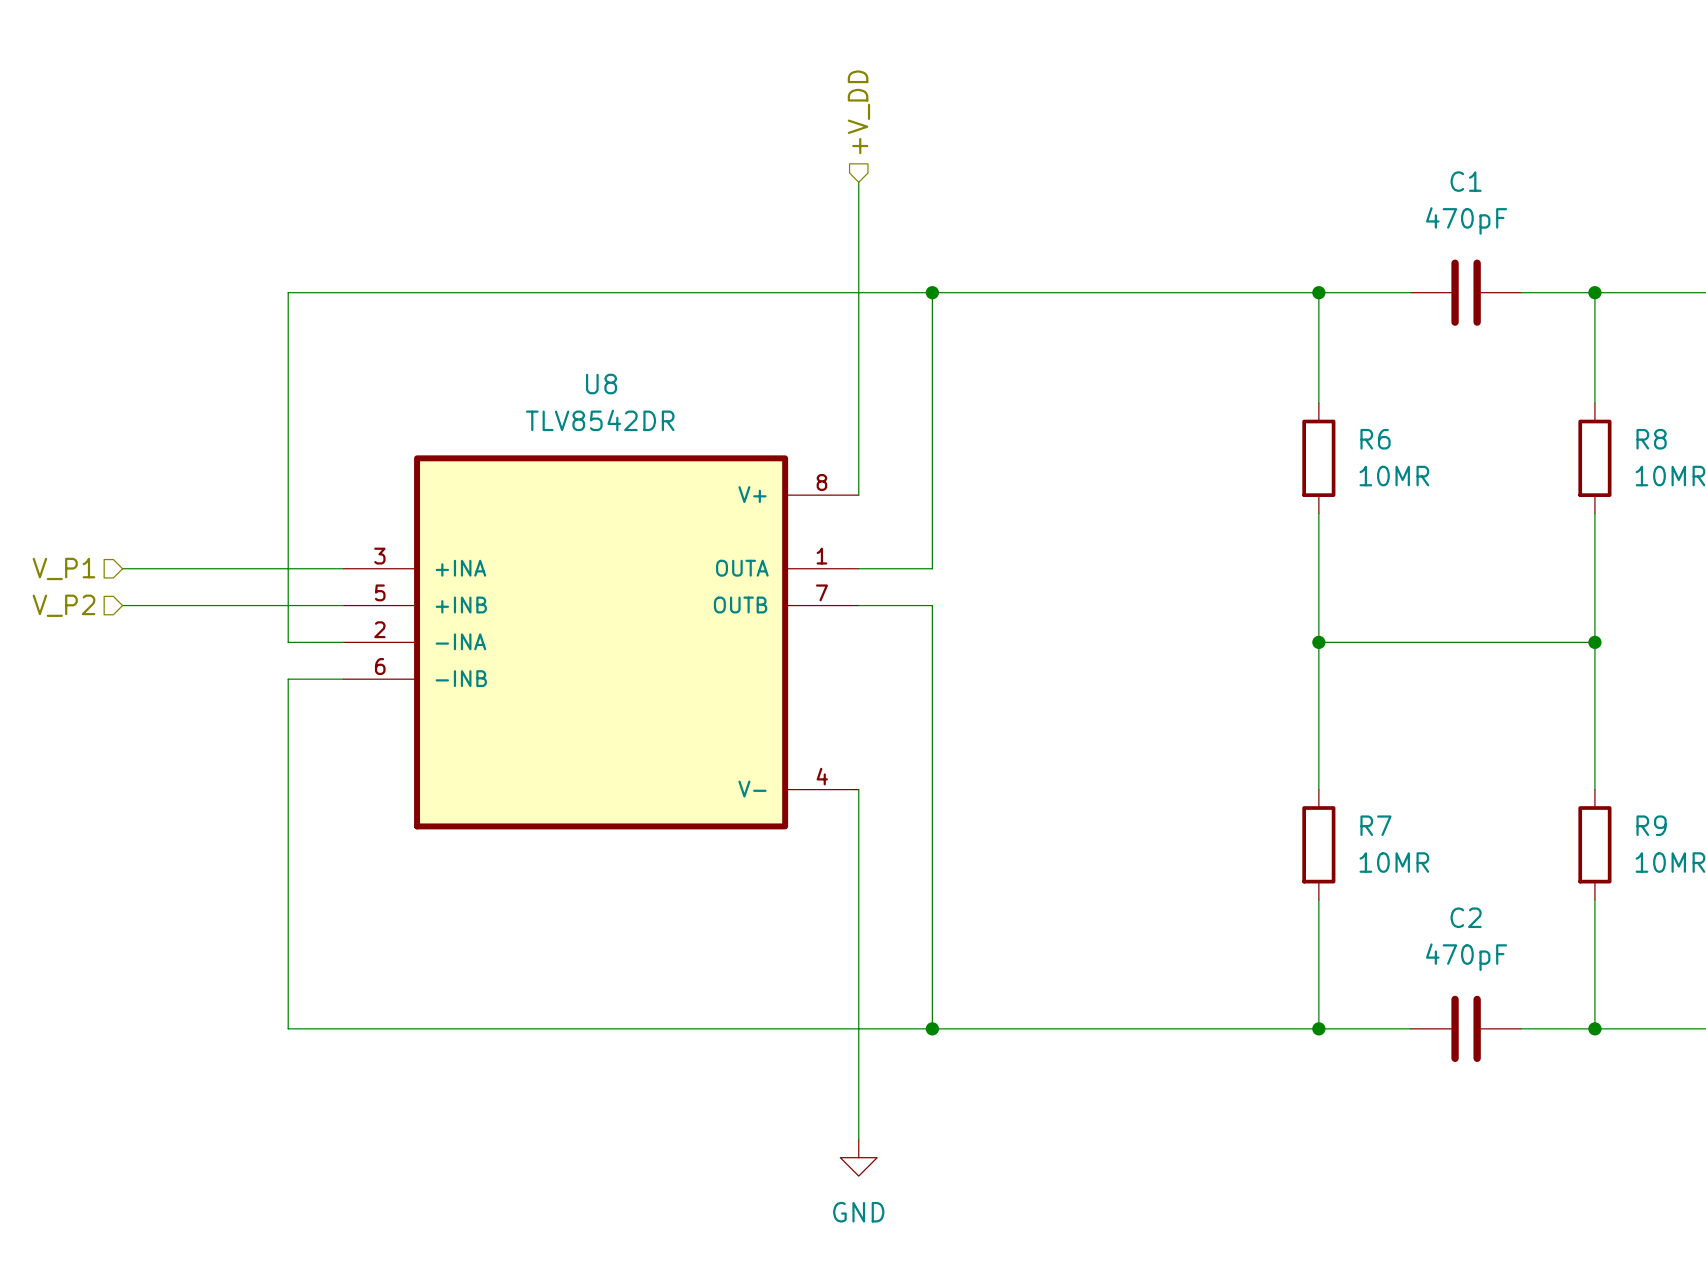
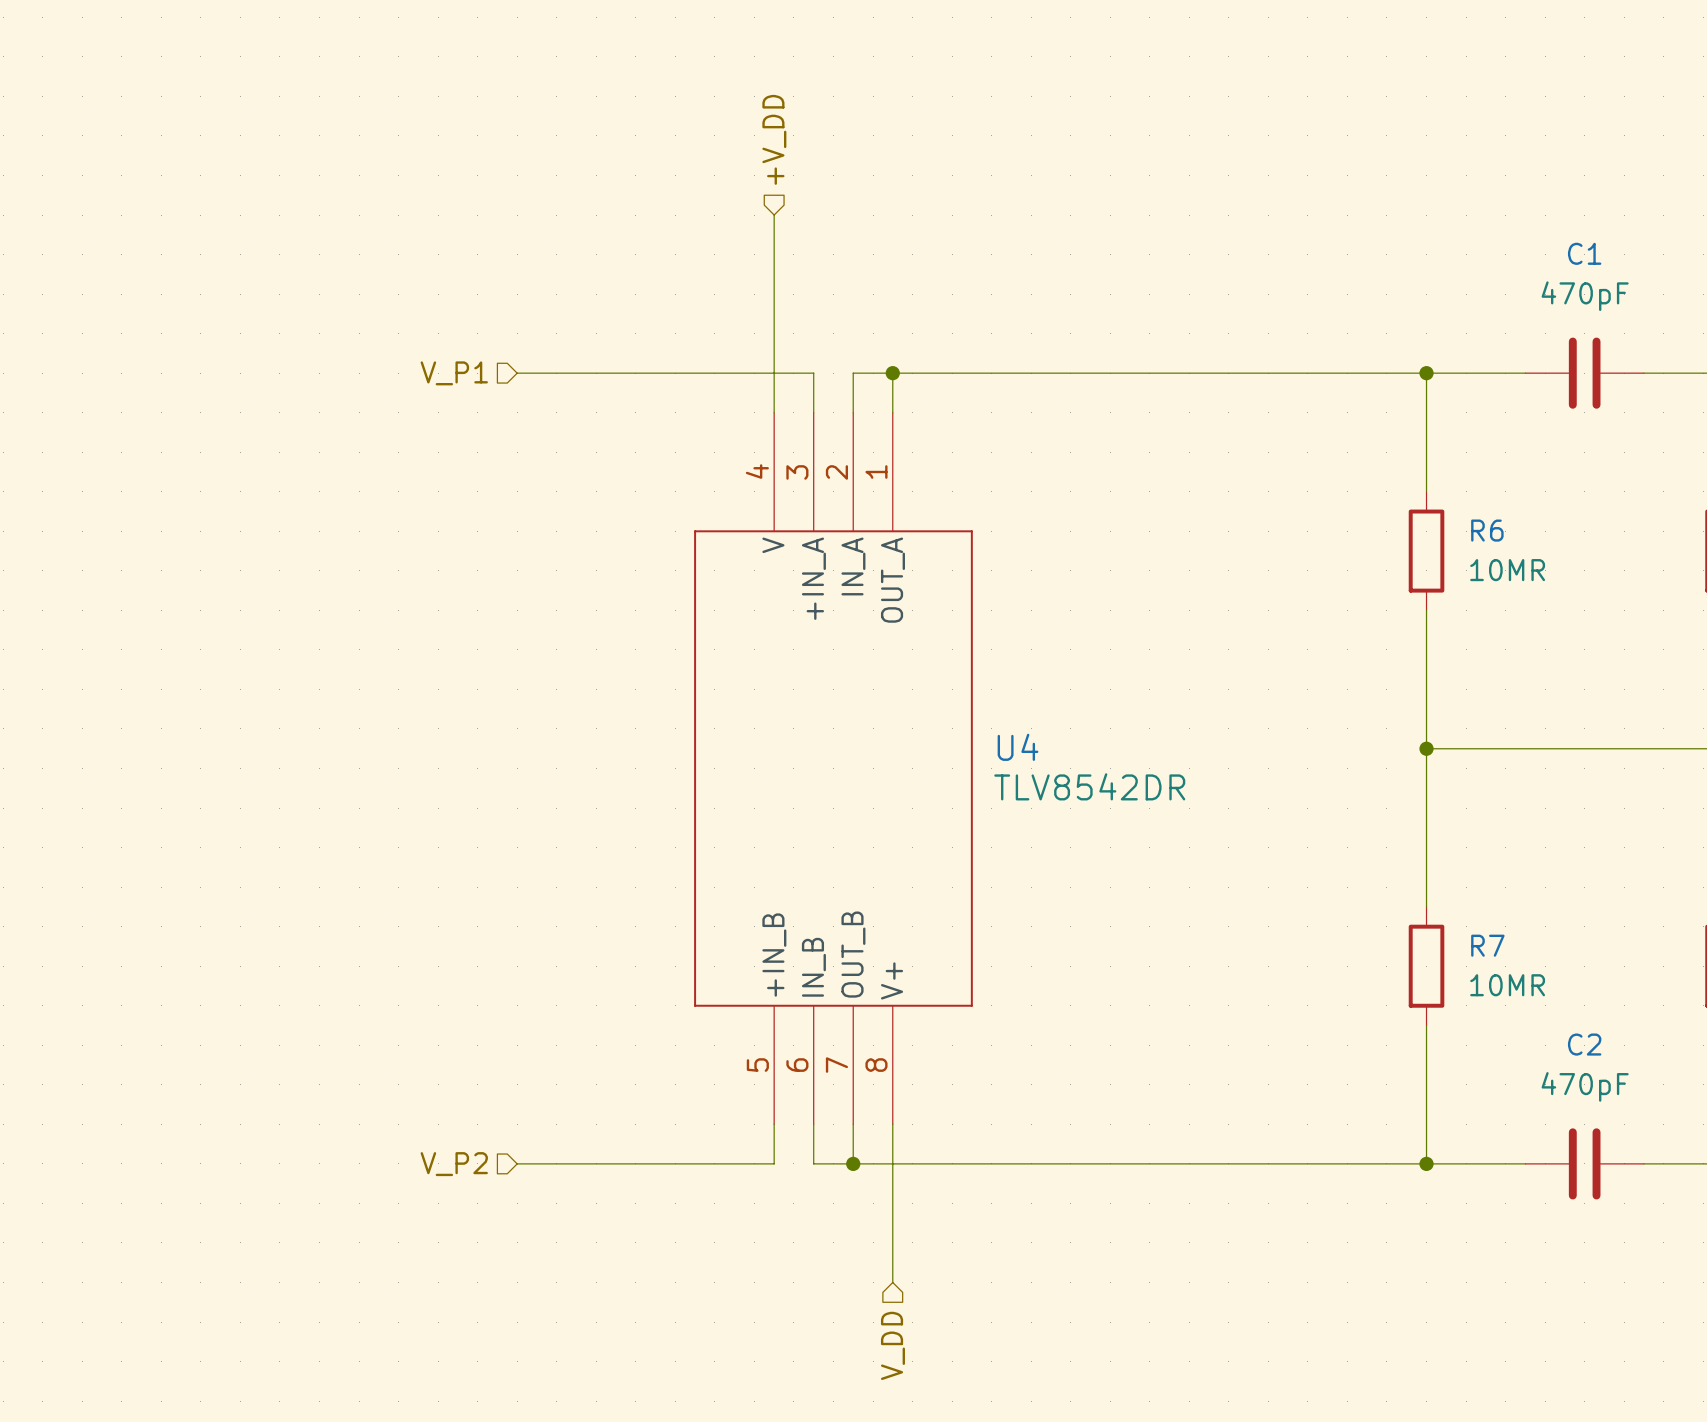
hierarchical label position: +V_DD (858, 112) -> +V_DD (774, 139)
wire: none -> (774, 215) (774, 412)
wire: (858, 182) (858, 495) -> none
hierarchical label: none -> V_P1 (454, 373)
wire: (472, 292) (288, 292) (288, 642) (343, 642) -> none
wire: (748, 292) (785, 292) -> (813, 373) (813, 412)
wire: none -> (853, 373) (853, 412)
wire: none -> (892, 373) (892, 412)
junction: none -> (892, 373)
wire: (932, 292) (932, 568) (858, 568) -> none
junction: (932, 292) -> none
hierarchical label: V_P1 (64, 568) -> none
wire: (122, 568) (343, 568) -> none
hierarchical label: V_P2 (64, 605) -> none
wire: (122, 605) (343, 605) -> none
wire: (858, 605) (932, 605) (932, 1028) -> none
U8: TLV8542DR (601, 642) -> none
U4: none -> TLV8542DR (833, 768)
wire: (343, 679) (288, 679) (288, 1028) (472, 1028) -> none
wire: (858, 789) (858, 1139) -> none
wire: none -> (813, 1124) (813, 1163)
wire: none -> (853, 1124) (853, 1163)
wire: none -> (892, 1124) (892, 1282)
wire: (711, 1028) (748, 1028) -> (774, 1163) (774, 1124)
junction: none -> (853, 1163)
junction: (932, 1028) -> none
hierarchical label: none -> V_P2 (454, 1164)
power symbol: GND (858, 1157) -> none
hierarchical label: none -> V_DD (892, 1345)

